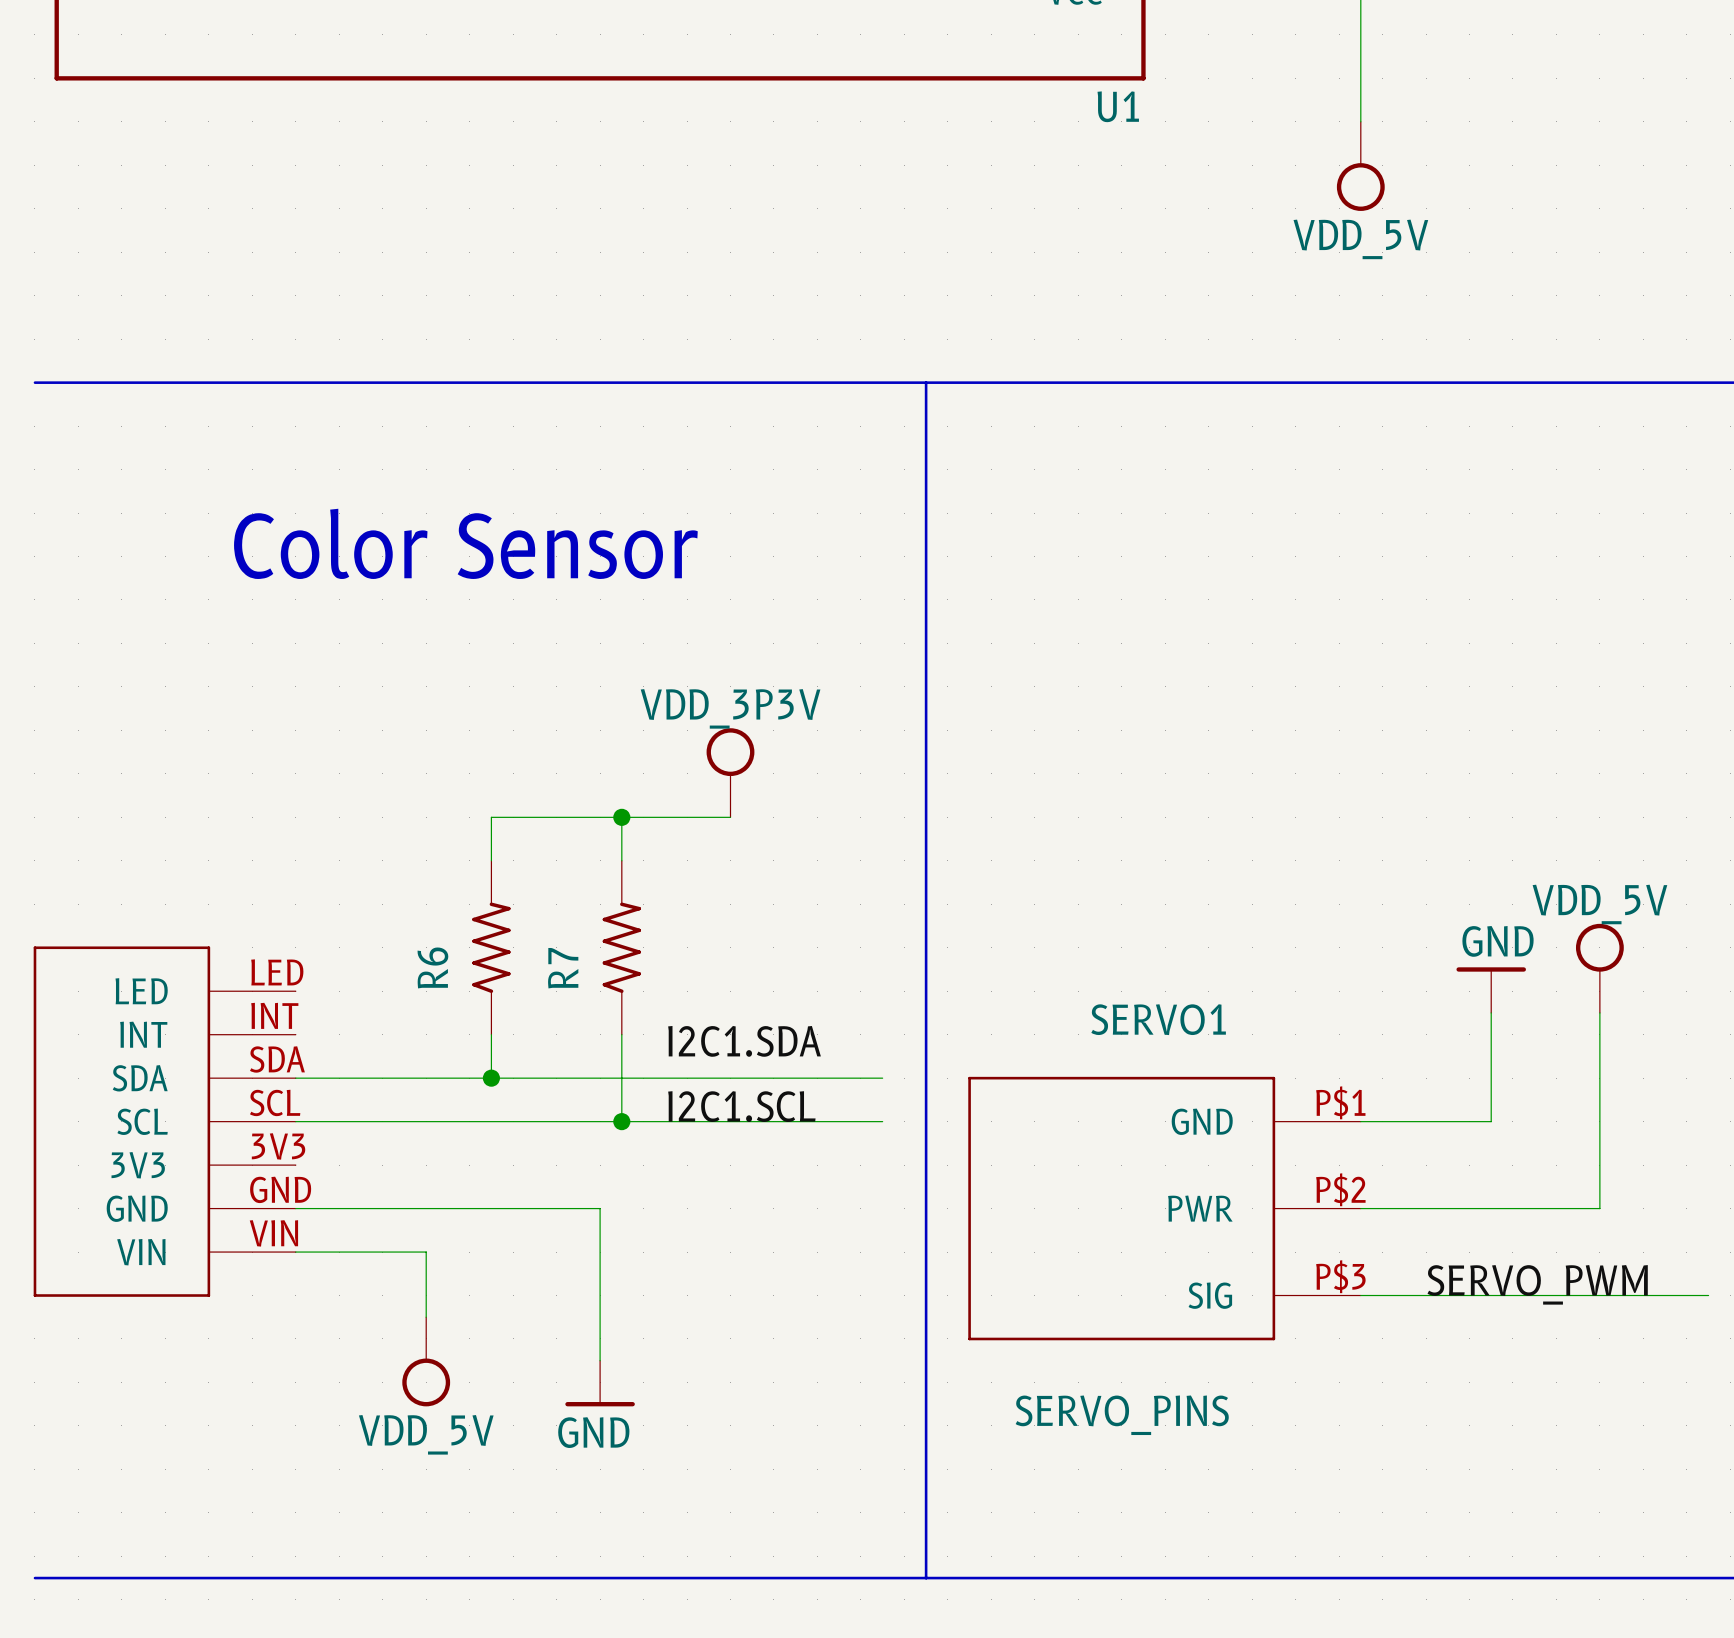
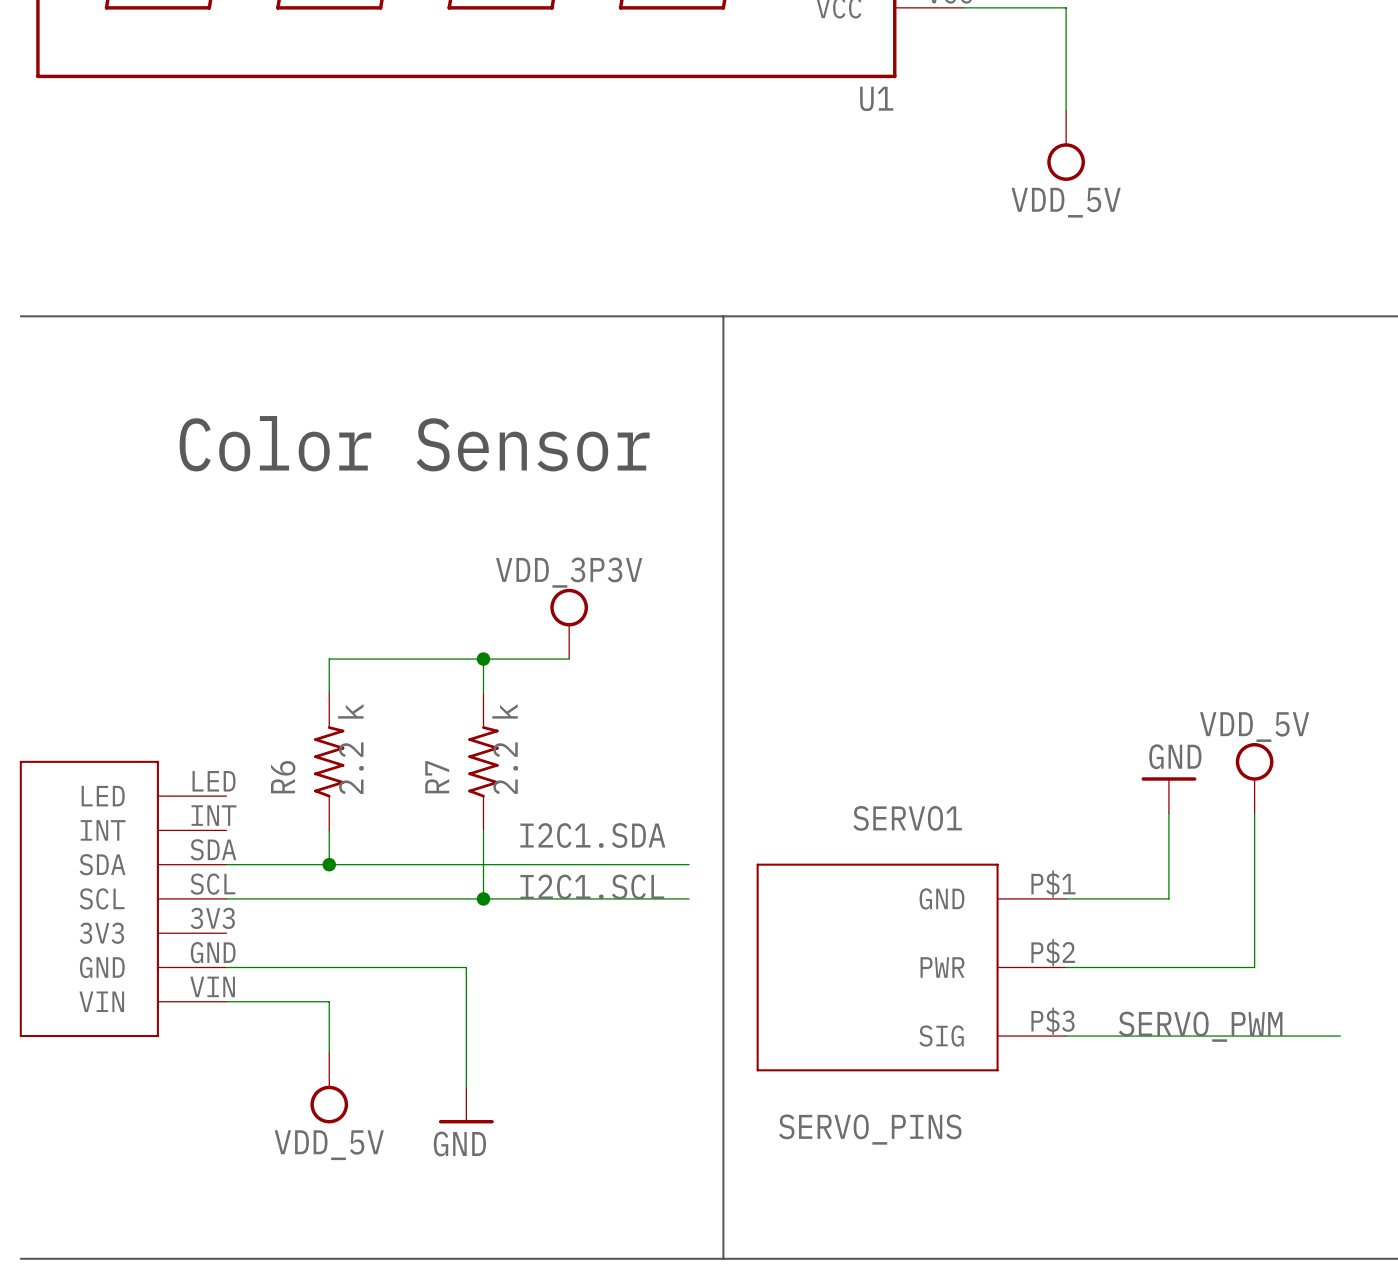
wire: (491, 817) (491, 860) -> (380, 659) (329, 659) (329, 693)
R6 value: none -> 2.2 k (350, 749)
R7 value: none -> 2.2 k (505, 749)
R6 position: (491, 947) -> (329, 761)
wire: (491, 1034) (491, 1078) -> (329, 830) (329, 864)
junction position: (491, 1078) -> (329, 864)

